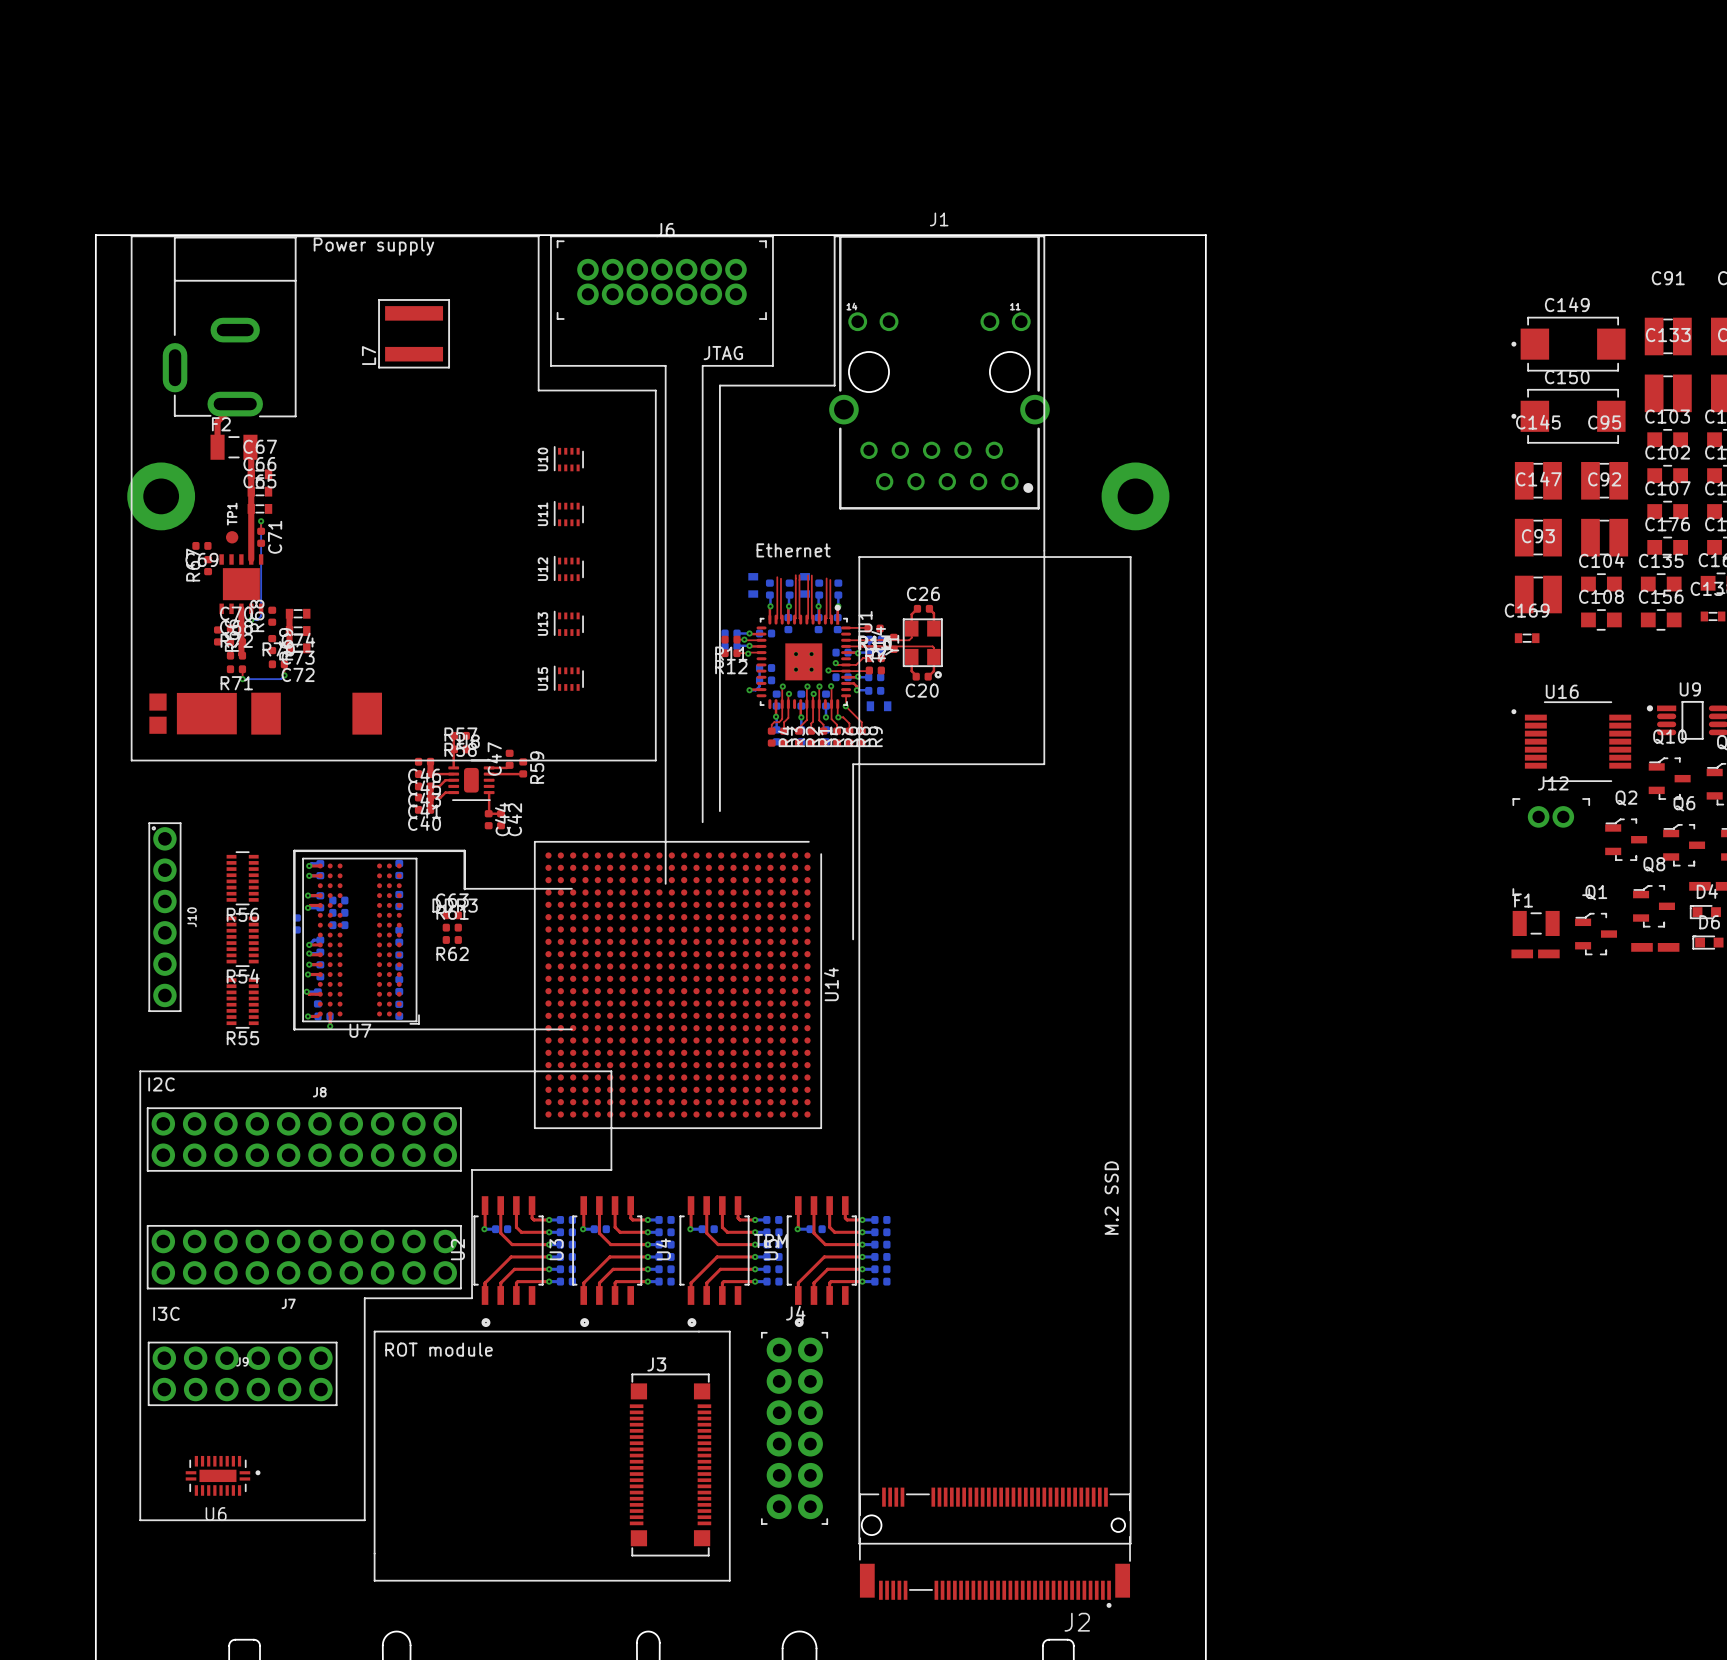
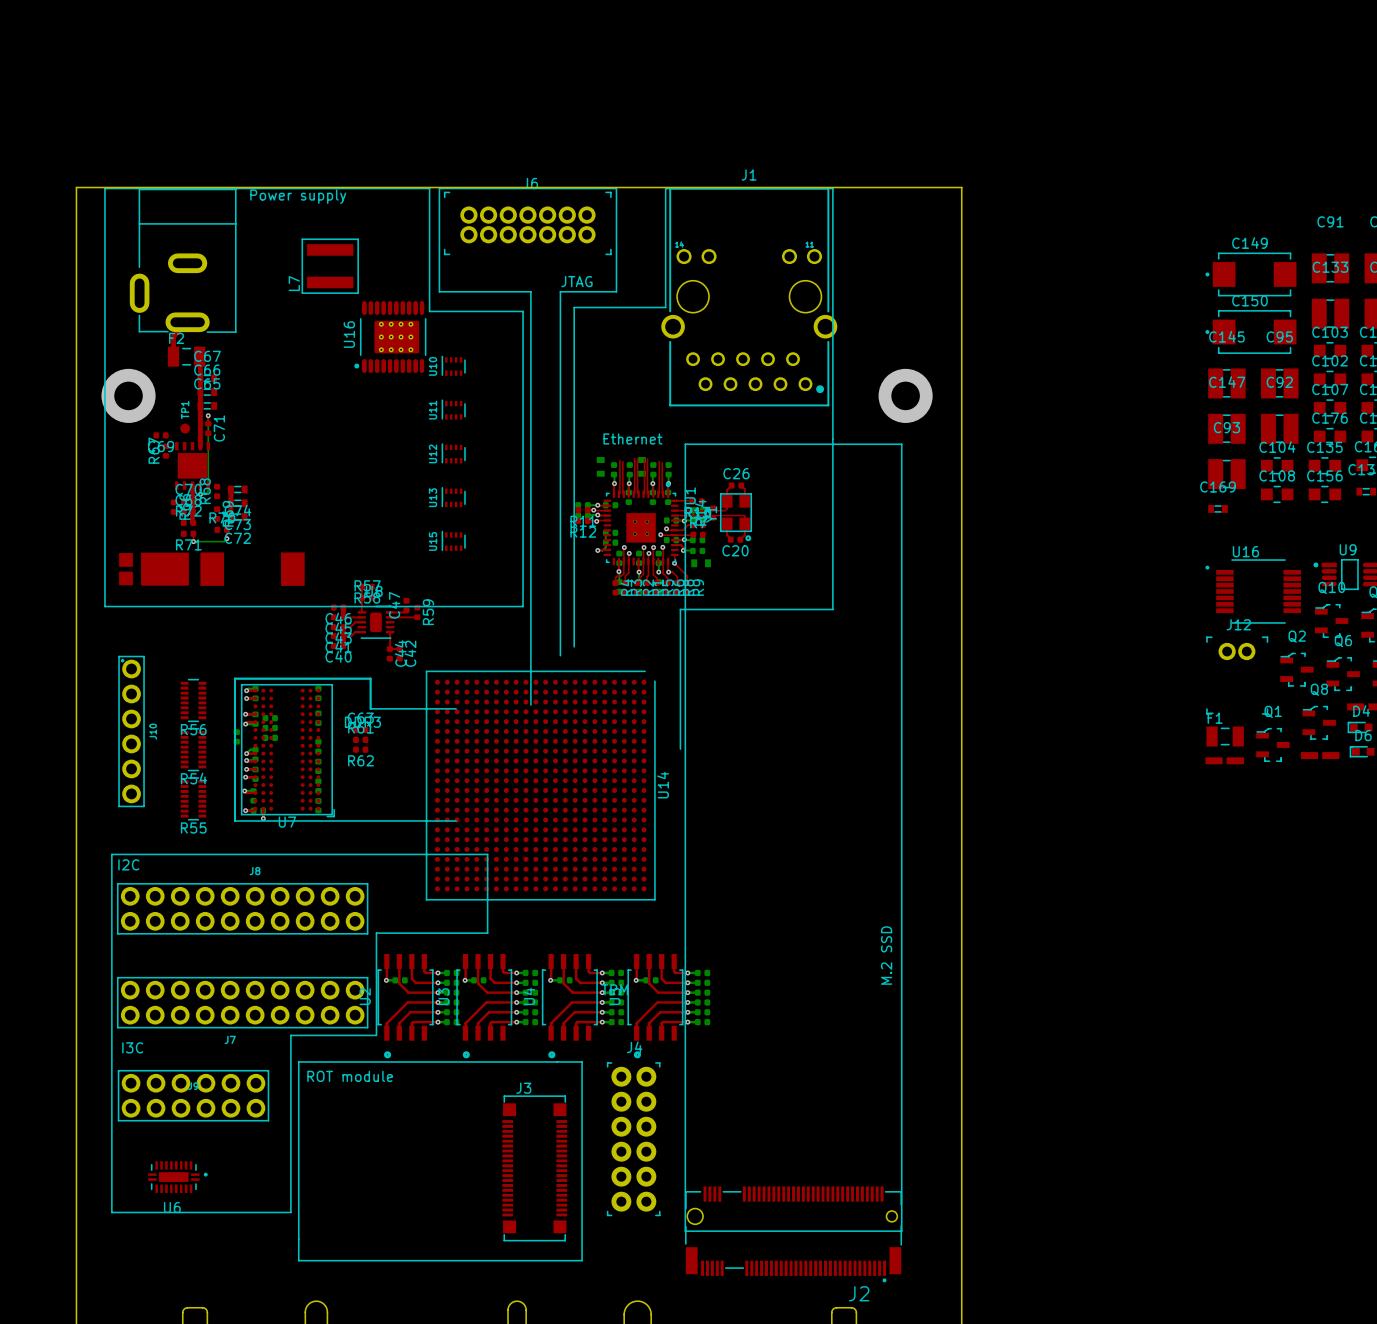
U16: none -> (390, 337)

